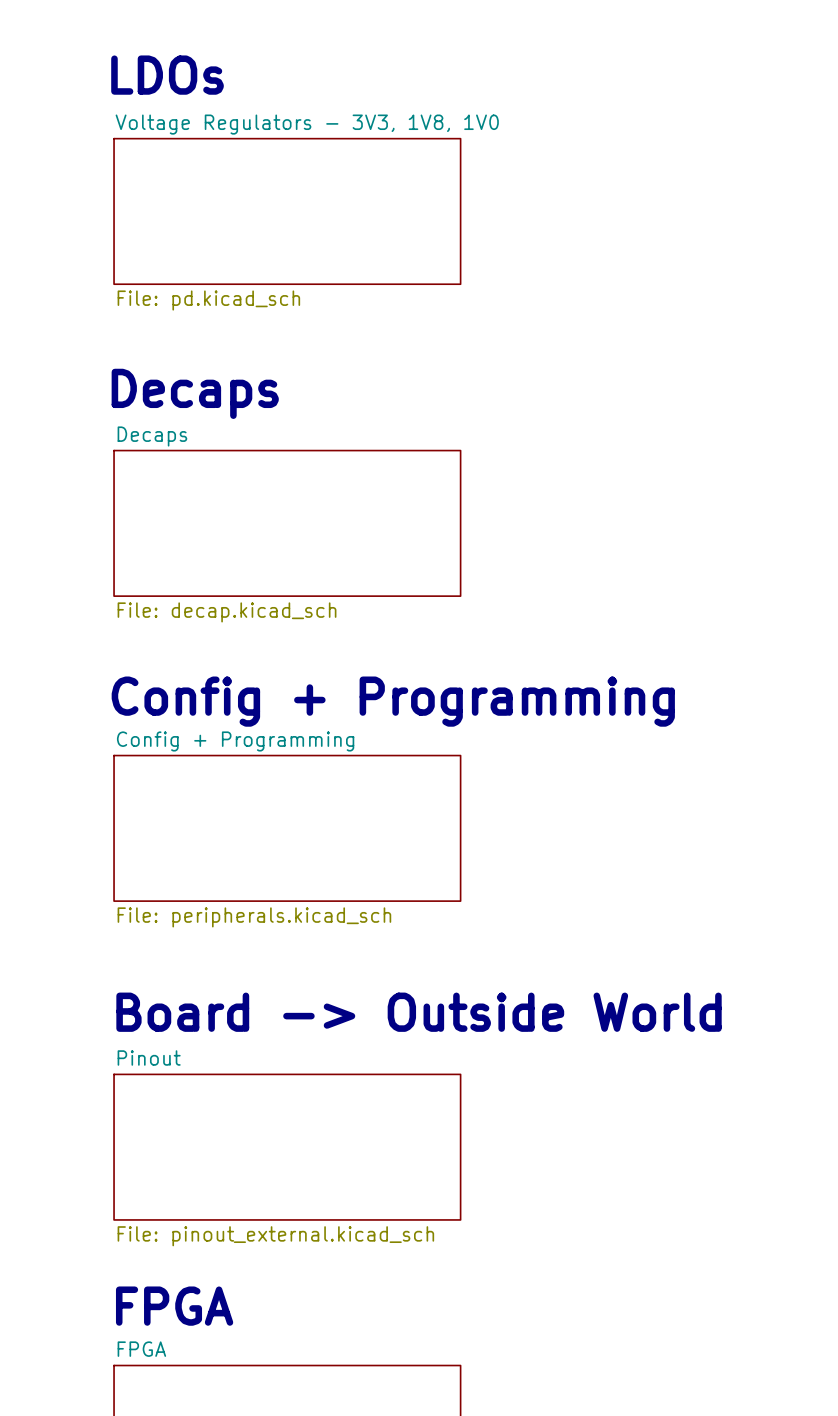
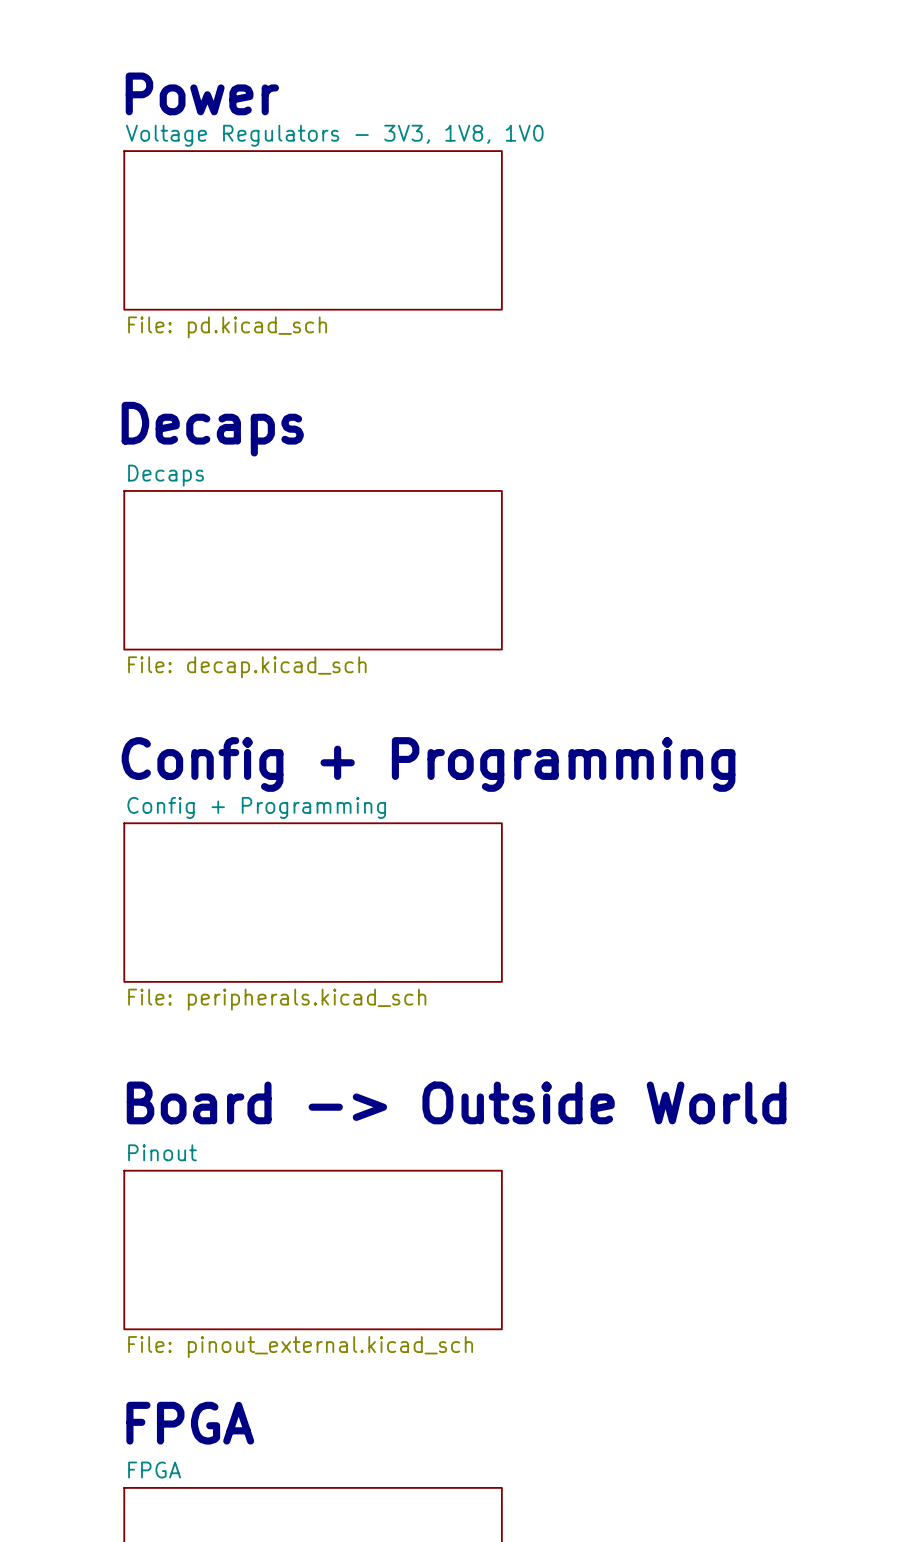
text: LDOs (167, 75) -> none
text: none -> Power (202, 93)

